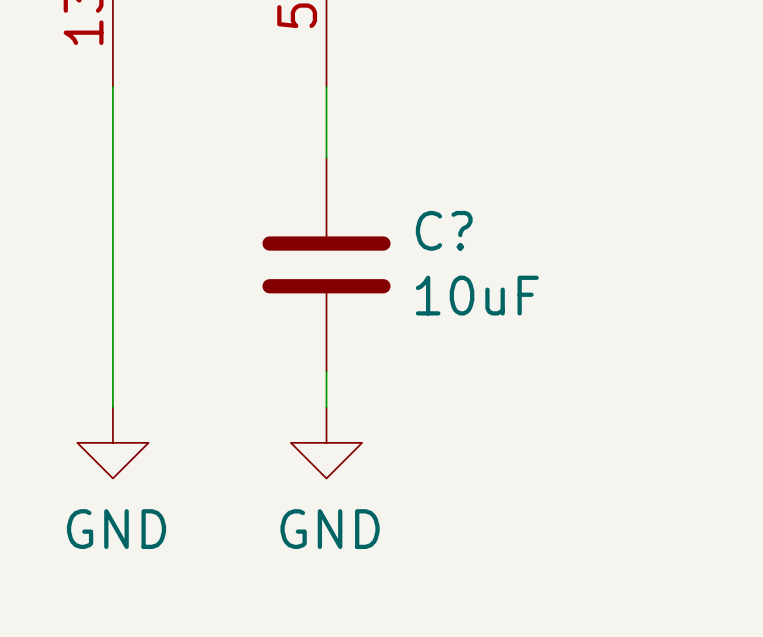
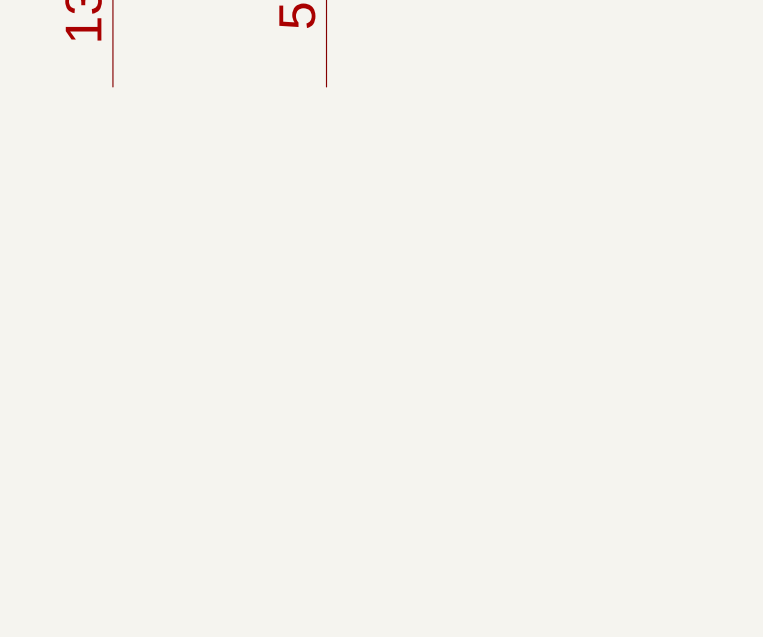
wire: (112, 86) (112, 407) -> none
wire: (326, 86) (326, 158) -> none
C?: 10uF (326, 264) -> none
wire: (326, 371) (326, 407) -> none
power symbol: GND (112, 442) -> none
power symbol: GND (326, 442) -> none

